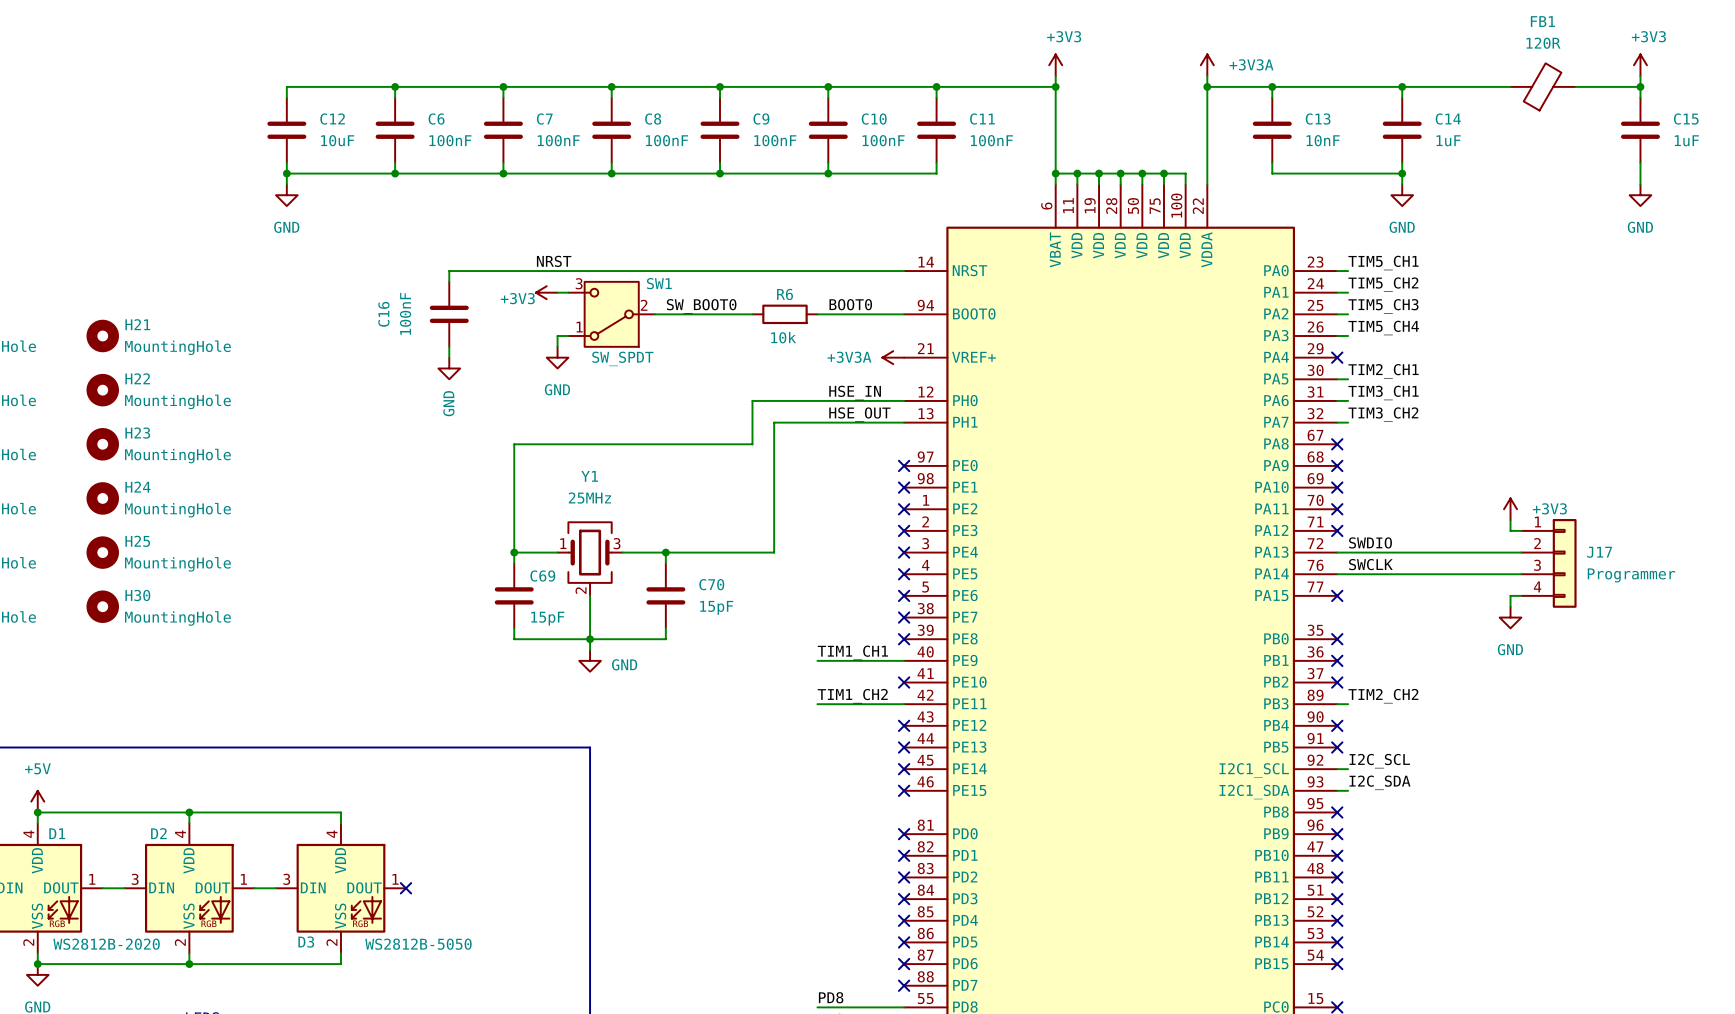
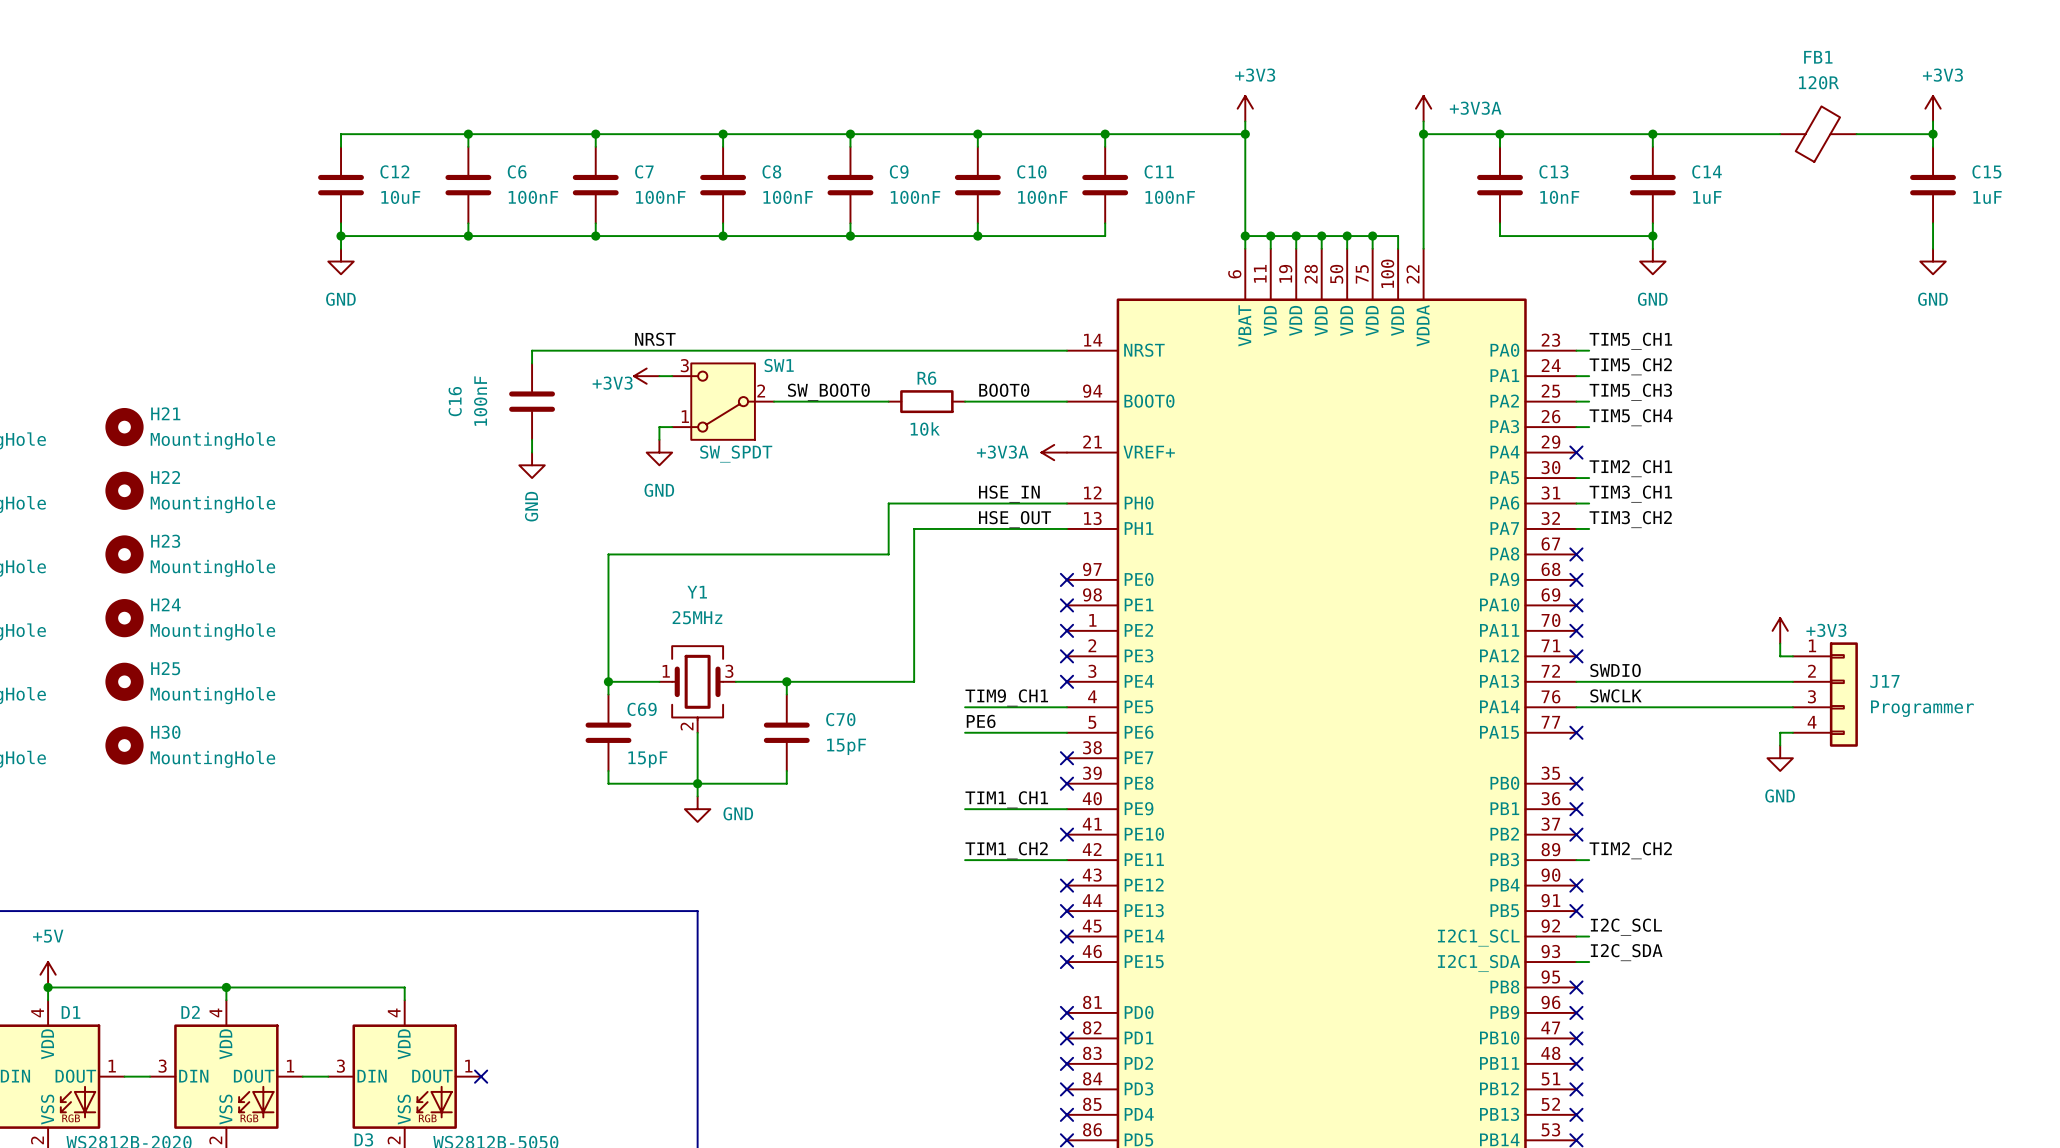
label: none -> TIM9_CH1 (1006, 697)
wire: none -> (965, 707) (1066, 707)
no-connect mark: (904, 574) -> none
label: none -> PE6 (981, 721)
wire: none -> (965, 732) (1066, 732)
no-connect mark: (904, 595) -> none

